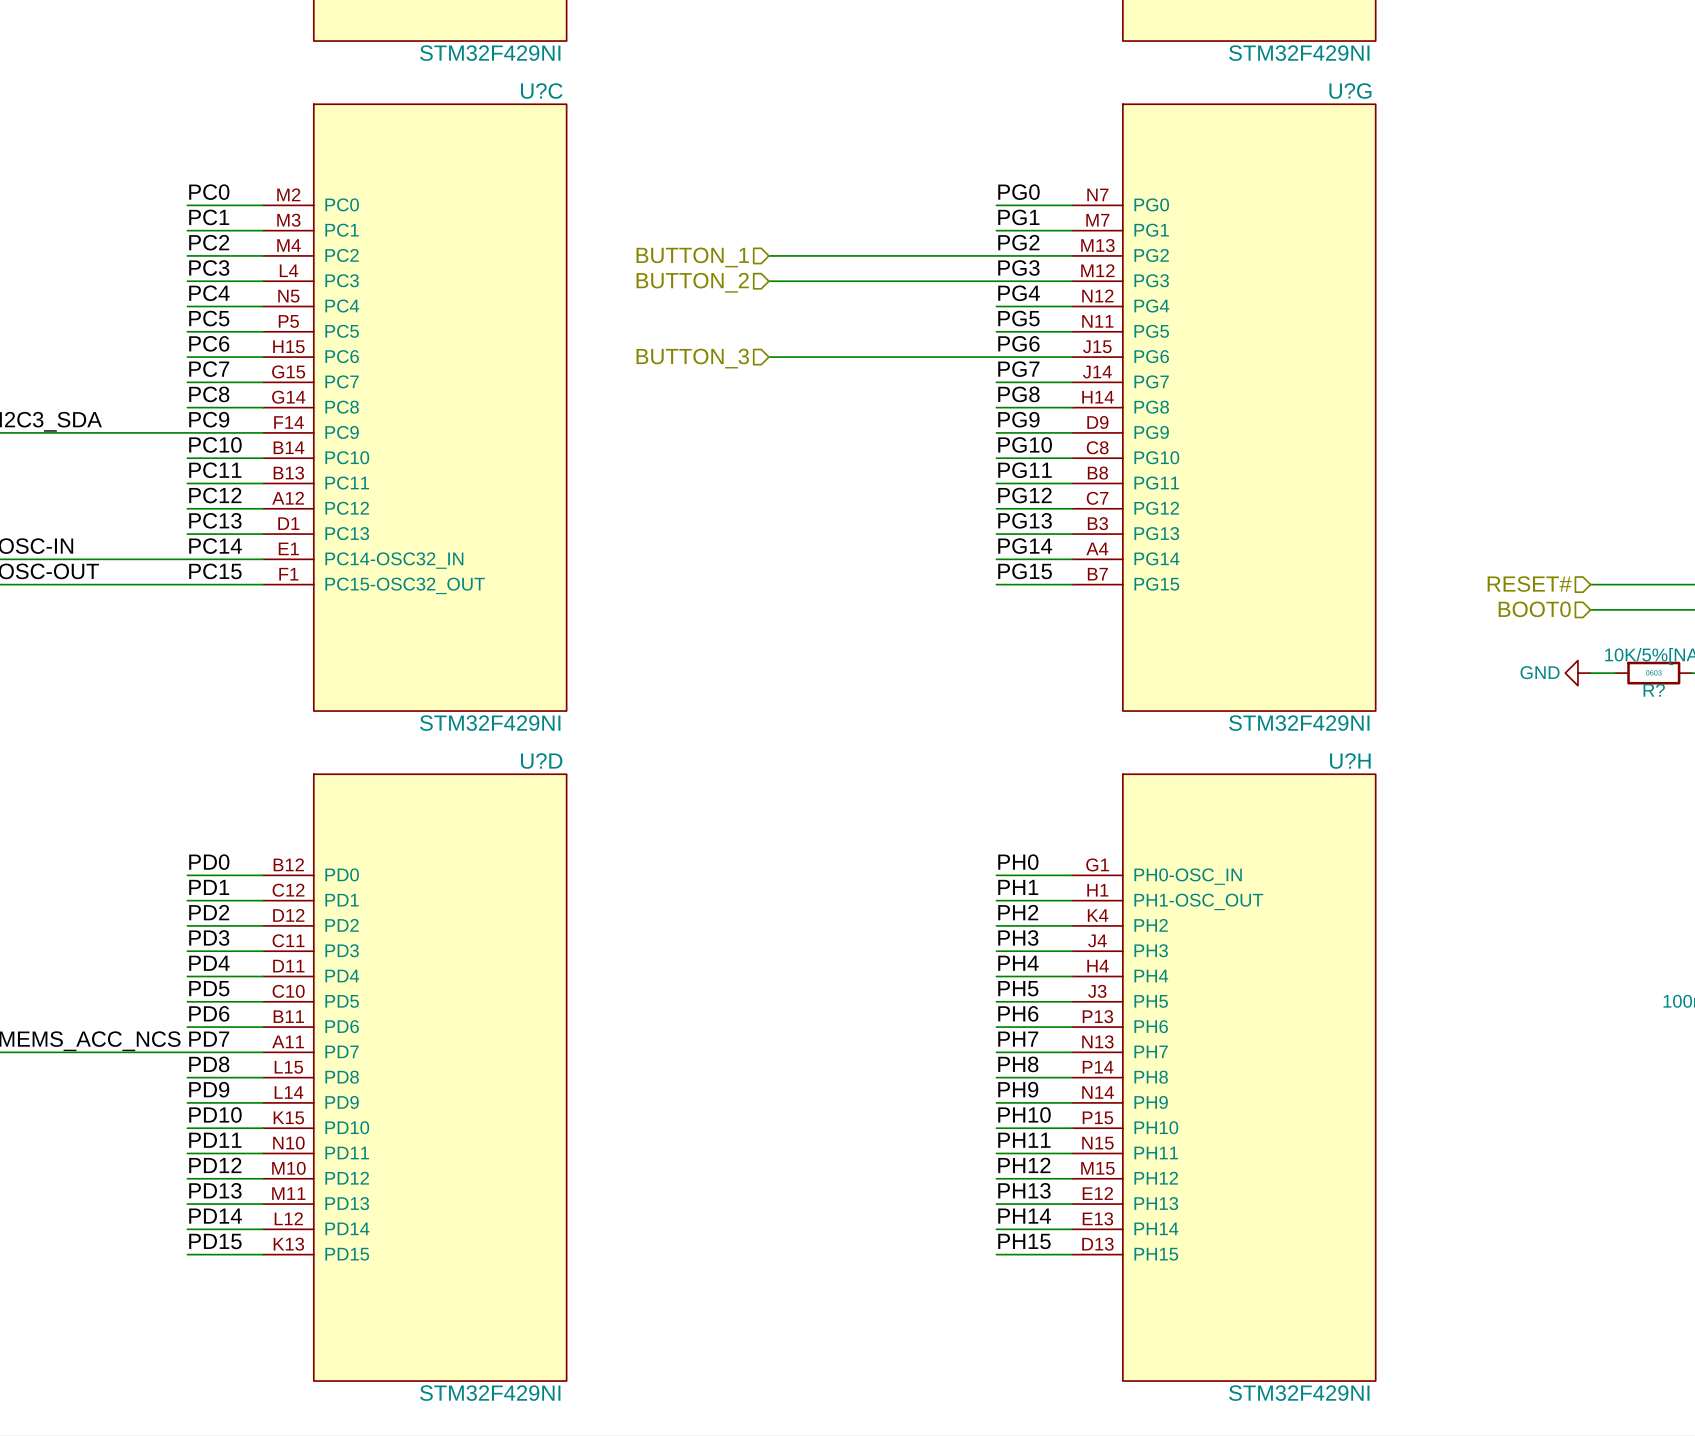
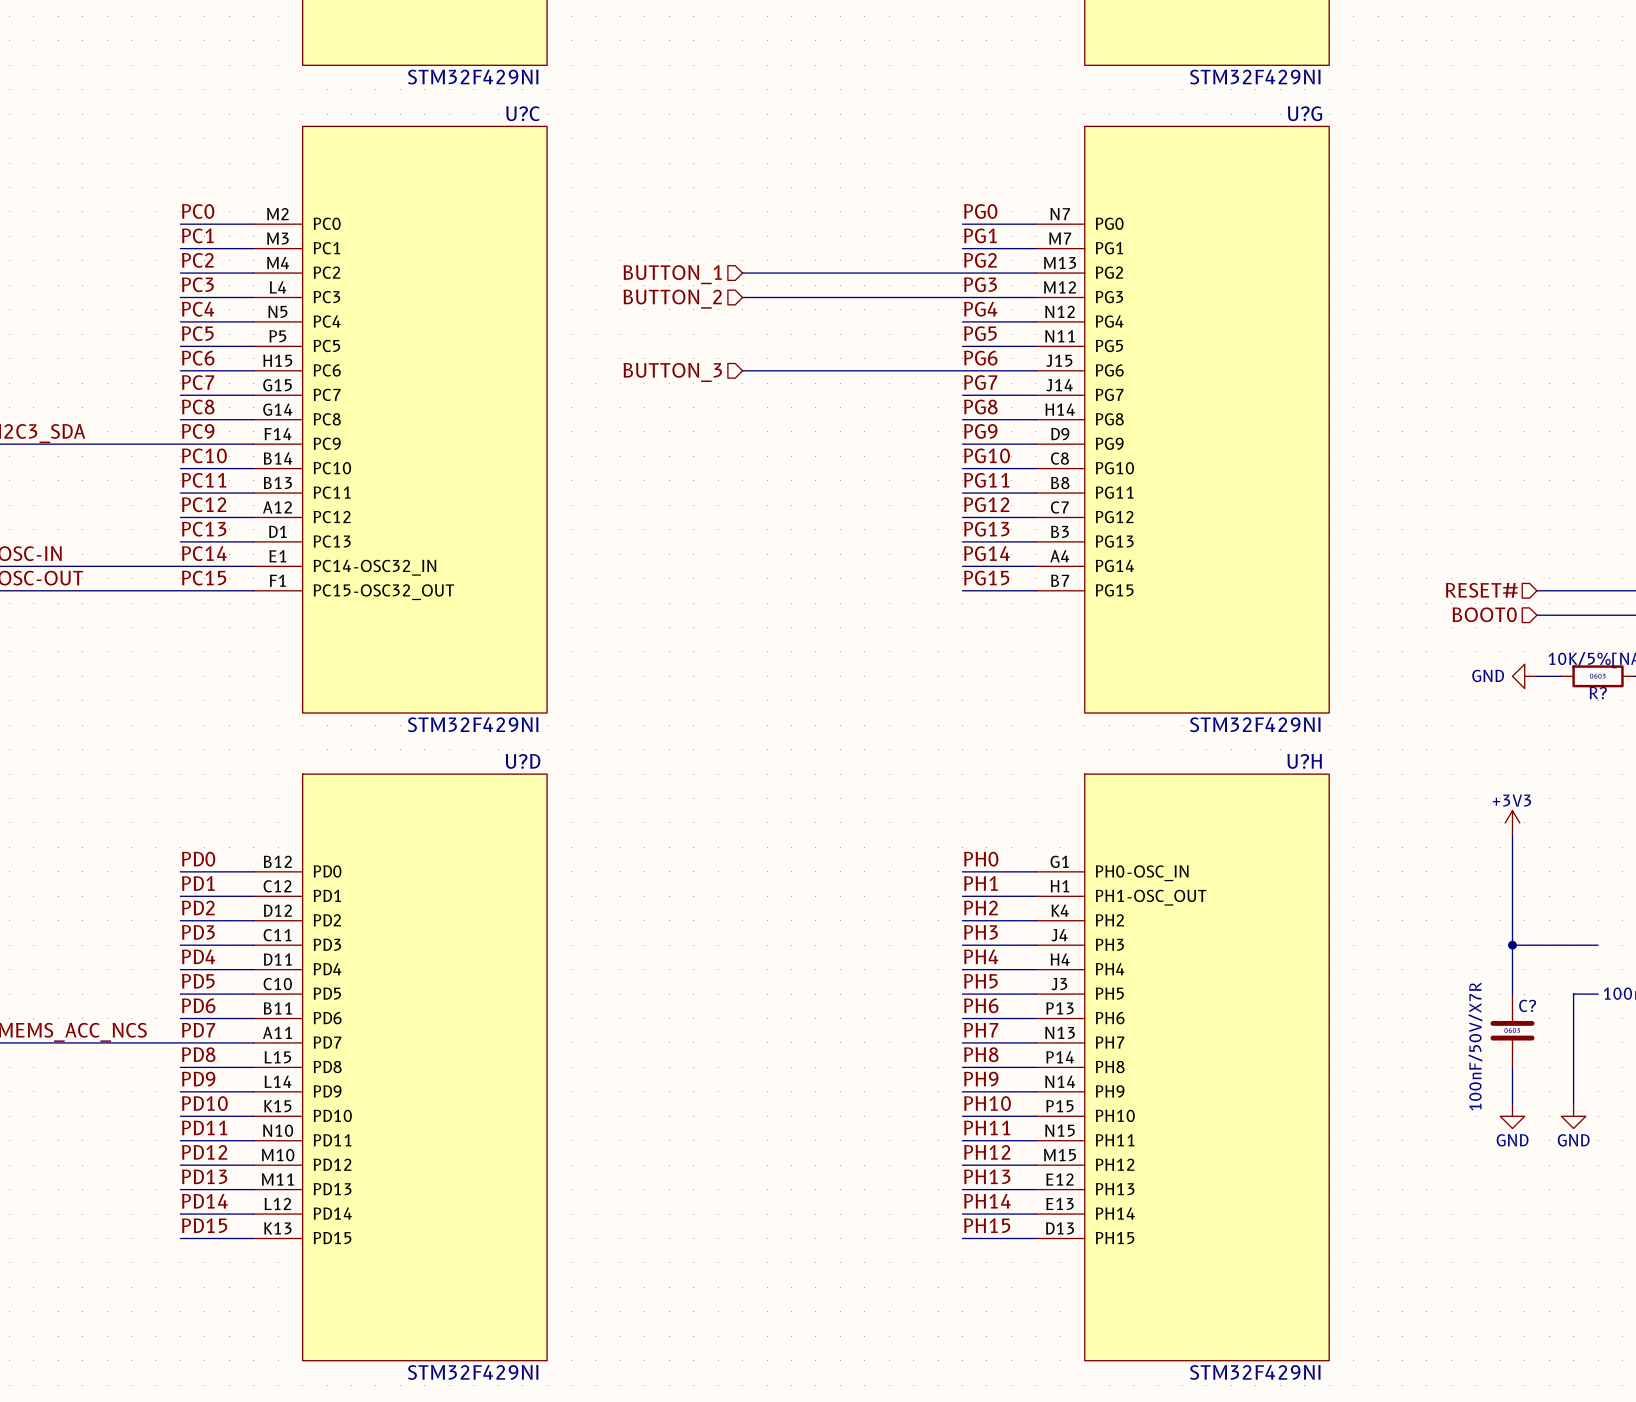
power symbol: none -> +3V3 (1512, 822)
wire: none -> (1512, 835) (1512, 994)
wire: none -> (1512, 945) (1598, 945)
junction: none -> (1512, 945)
wire: none -> (1598, 994) (1573, 994) (1573, 1104)
C?: none -> 100nF/50V/X7R (1512, 1030)
wire: none -> (1512, 1067) (1512, 1104)
power symbol: none -> GND (1512, 1116)
power symbol: none -> GND (1573, 1116)

